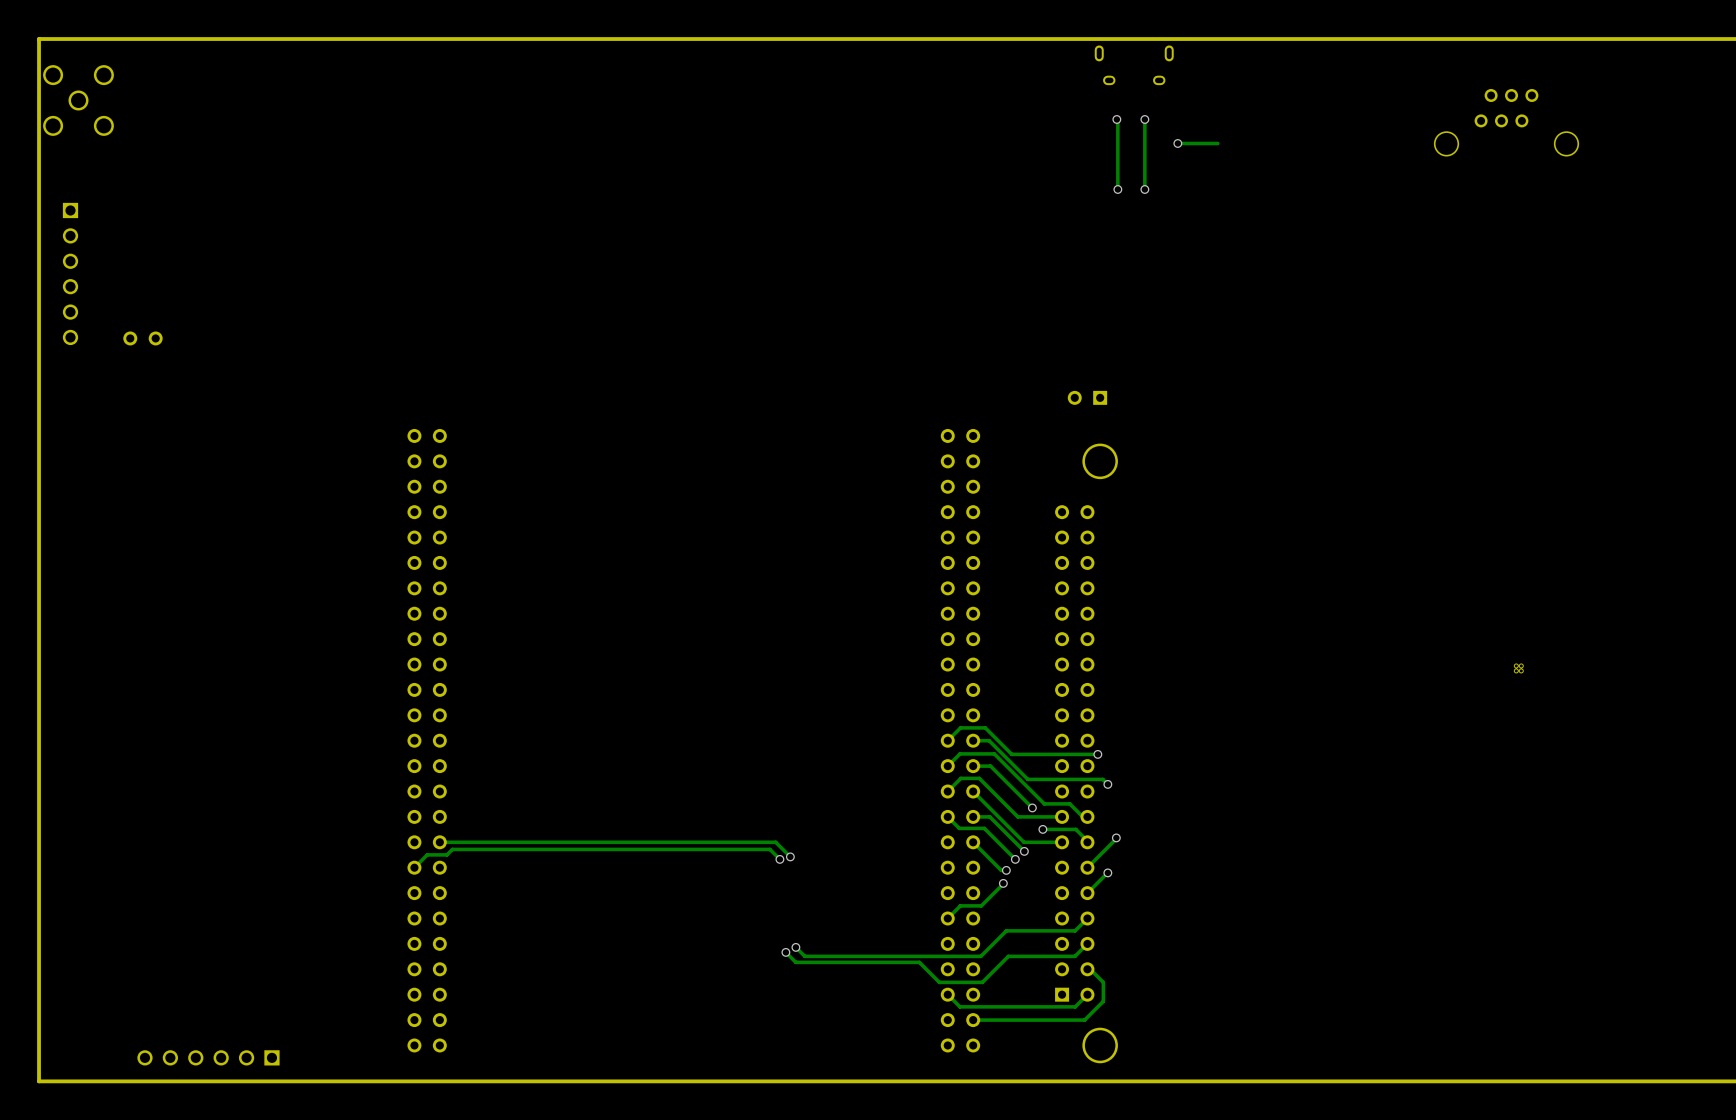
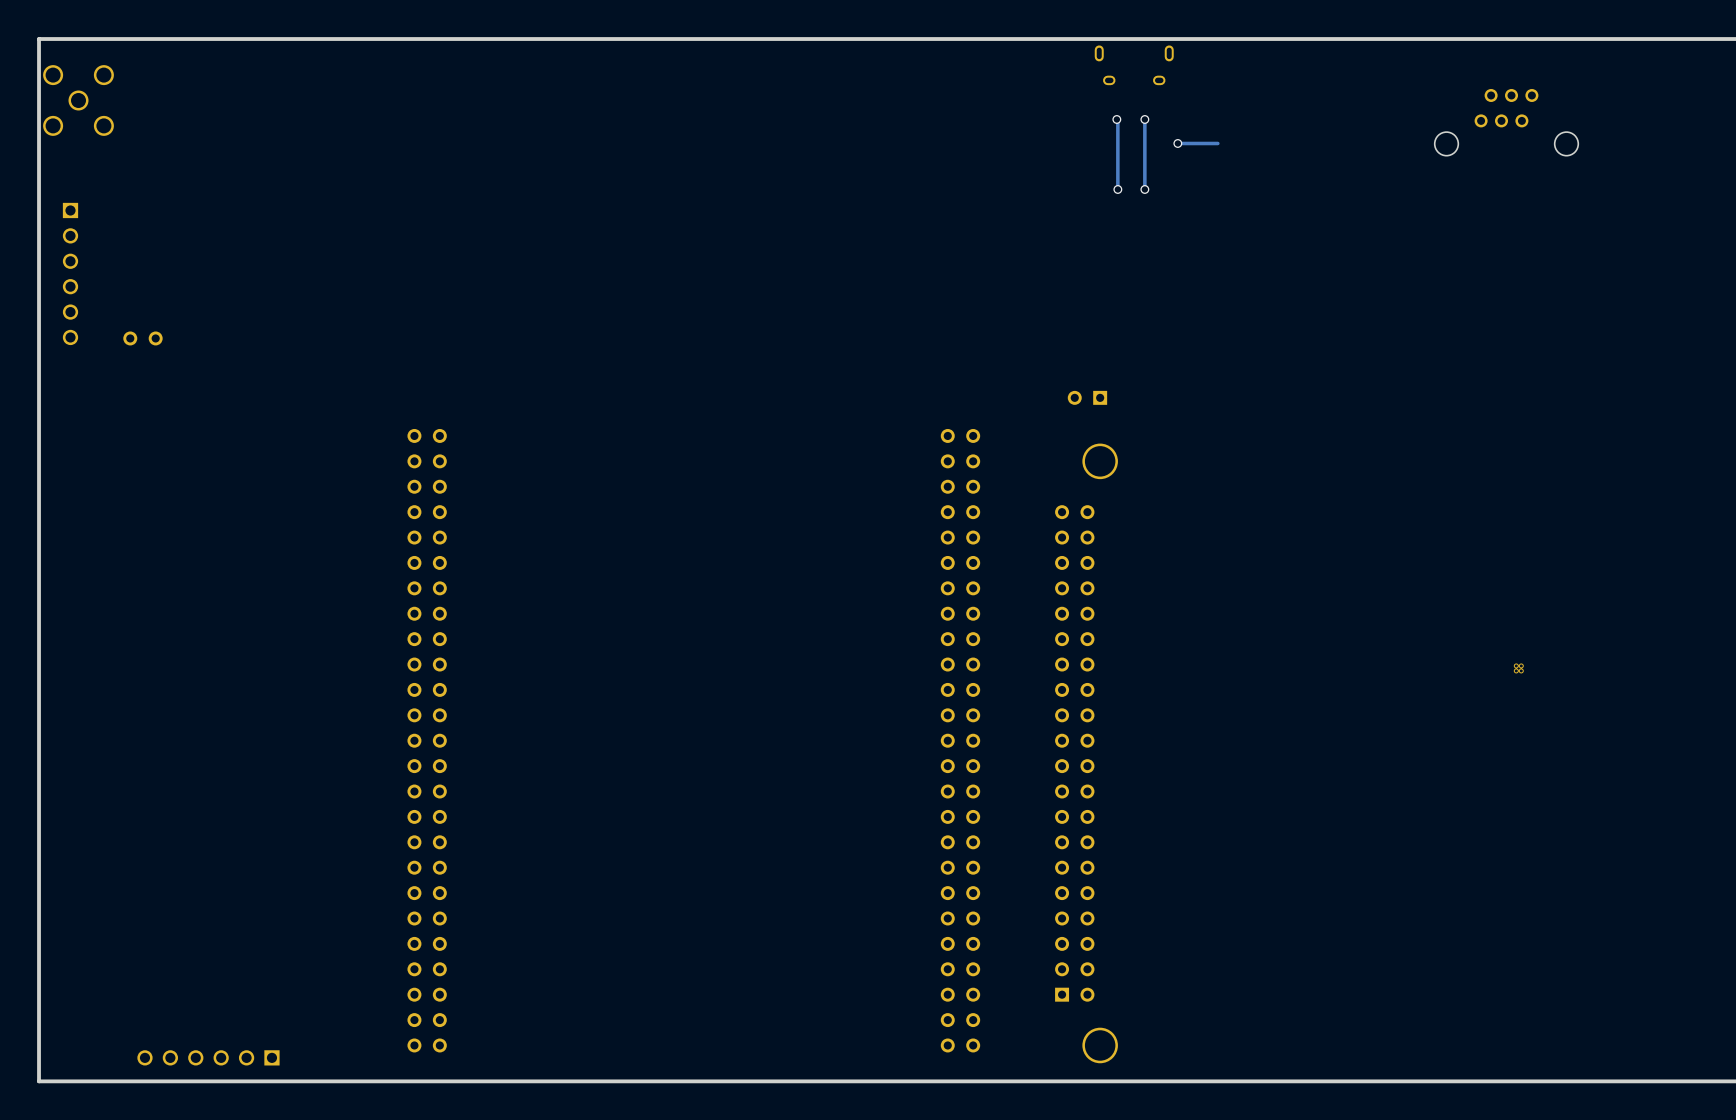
track: (947, 740) (960, 727) (985, 727) (1011, 754) (1097, 754) -> none
track: (973, 740) (989, 740) (1027, 779) (1102, 779) (1107, 784) -> none
via: (1097, 754) -> none
track: (947, 766) (959, 753) (994, 753) (1044, 803) (1069, 803) (1082, 816) (1087, 816) -> none
track: (973, 766) (990, 766) (1032, 807) -> none
via: (1107, 784) -> none
track: (947, 791) (960, 778) (979, 778) (1017, 816) (1062, 816) -> none
track: (973, 791) (1023, 842) (1062, 842) -> none
via: (1032, 807) -> none
track: (947, 816) (959, 828) (984, 828) (1015, 859) -> none
track: (973, 816) (989, 816) (1024, 851) -> none
track: (1042, 829) (1075, 829) (1087, 842) -> none
via: (1042, 829) -> none
track: (1116, 837) (1087, 867) -> none
via: (1116, 837) -> none
track: (439, 842) (775, 842) (790, 856) -> none
track: (973, 842) (1001, 870) (1006, 870) -> none
via: (1024, 851) -> none
via: (790, 856) -> none
track: (779, 859) (769, 849) (452, 849) (446, 854) (427, 854) (414, 867) -> none
via: (779, 859) -> none
via: (1015, 859) -> none
via: (1006, 870) -> none
track: (1107, 872) (1087, 893) -> none
via: (1107, 872) -> none
track: (1003, 883) (981, 905) (960, 905) (947, 918) -> none
via: (1003, 883) -> none
track: (1087, 918) (1075, 930) (1006, 930) (980, 956) (804, 956) (795, 947) -> none
track: (1087, 943) (1074, 956) (1008, 956) (982, 982) (939, 982) (919, 962) (795, 962) (785, 952) -> none
via: (795, 947) -> none
via: (785, 952) -> none
track: (1087, 969) (1090, 969) (1103, 982) (1103, 1001) (1084, 1020) (973, 1020) -> none
track: (1087, 994) (1075, 1006) (959, 1006) (947, 994) -> none

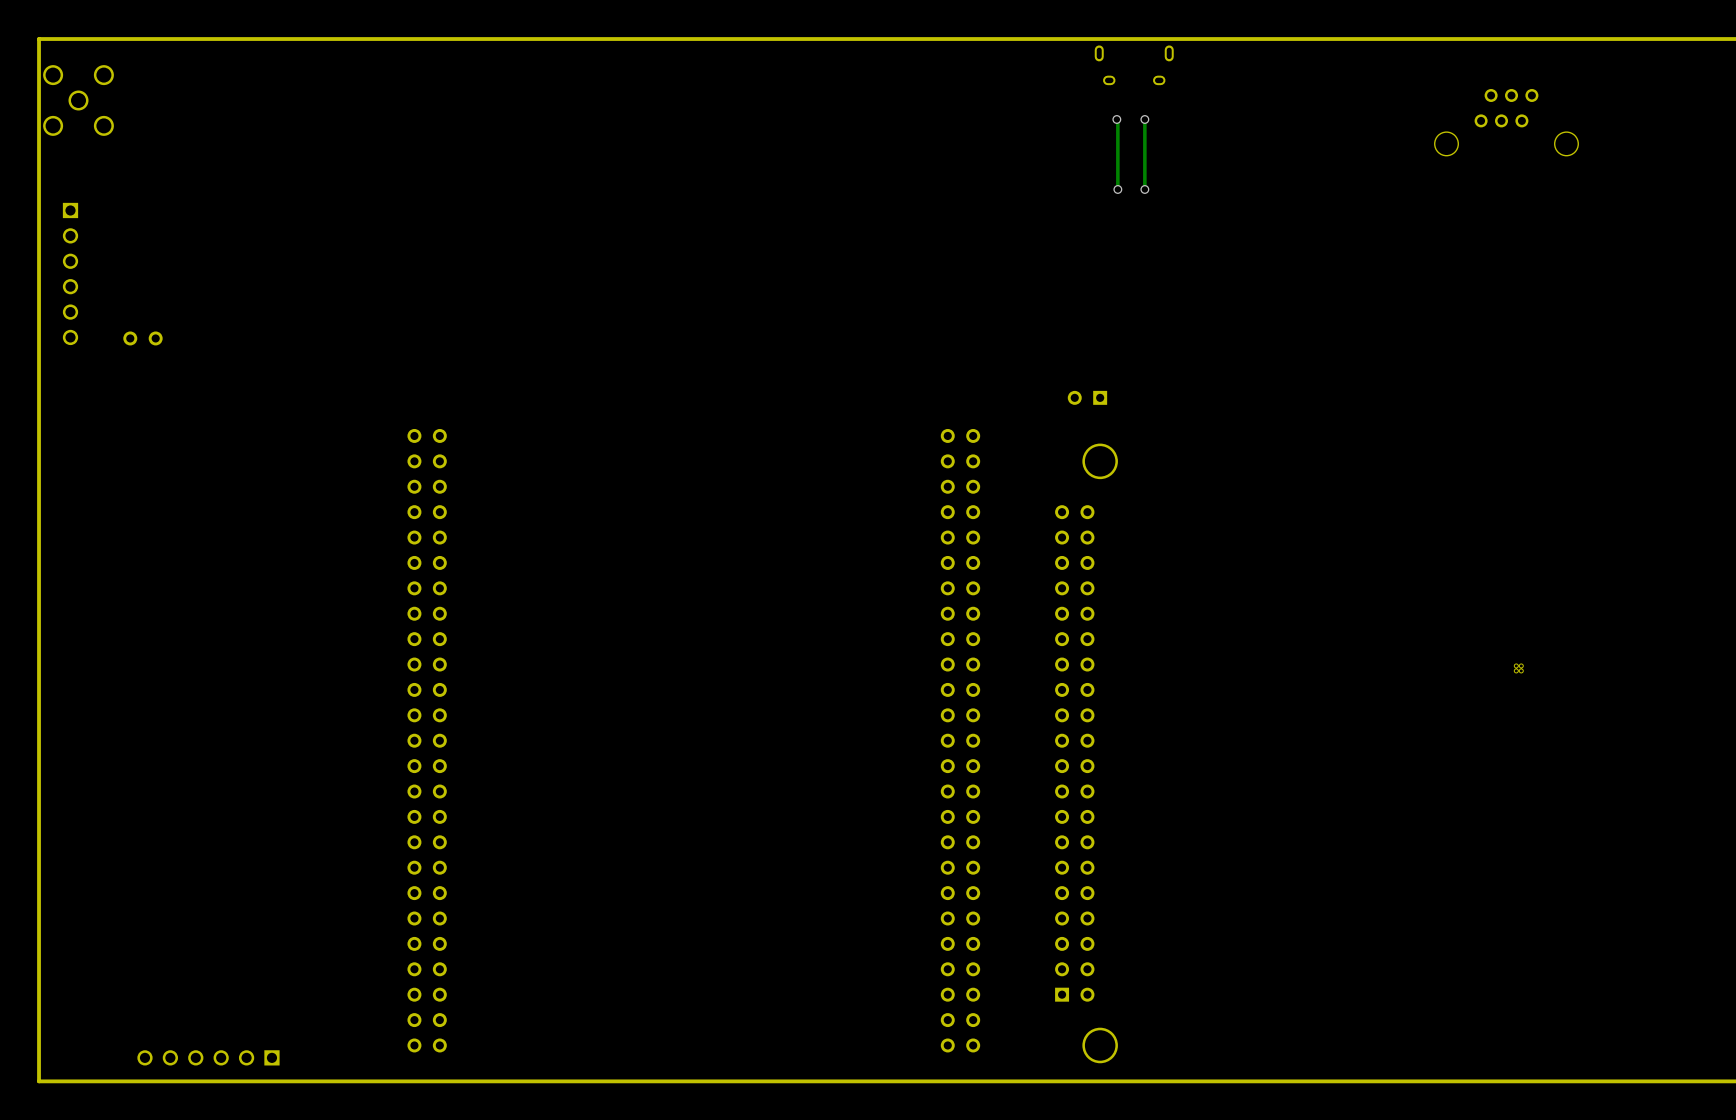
via: (1177, 143) -> none
track: (1217, 143) (1177, 143) -> none

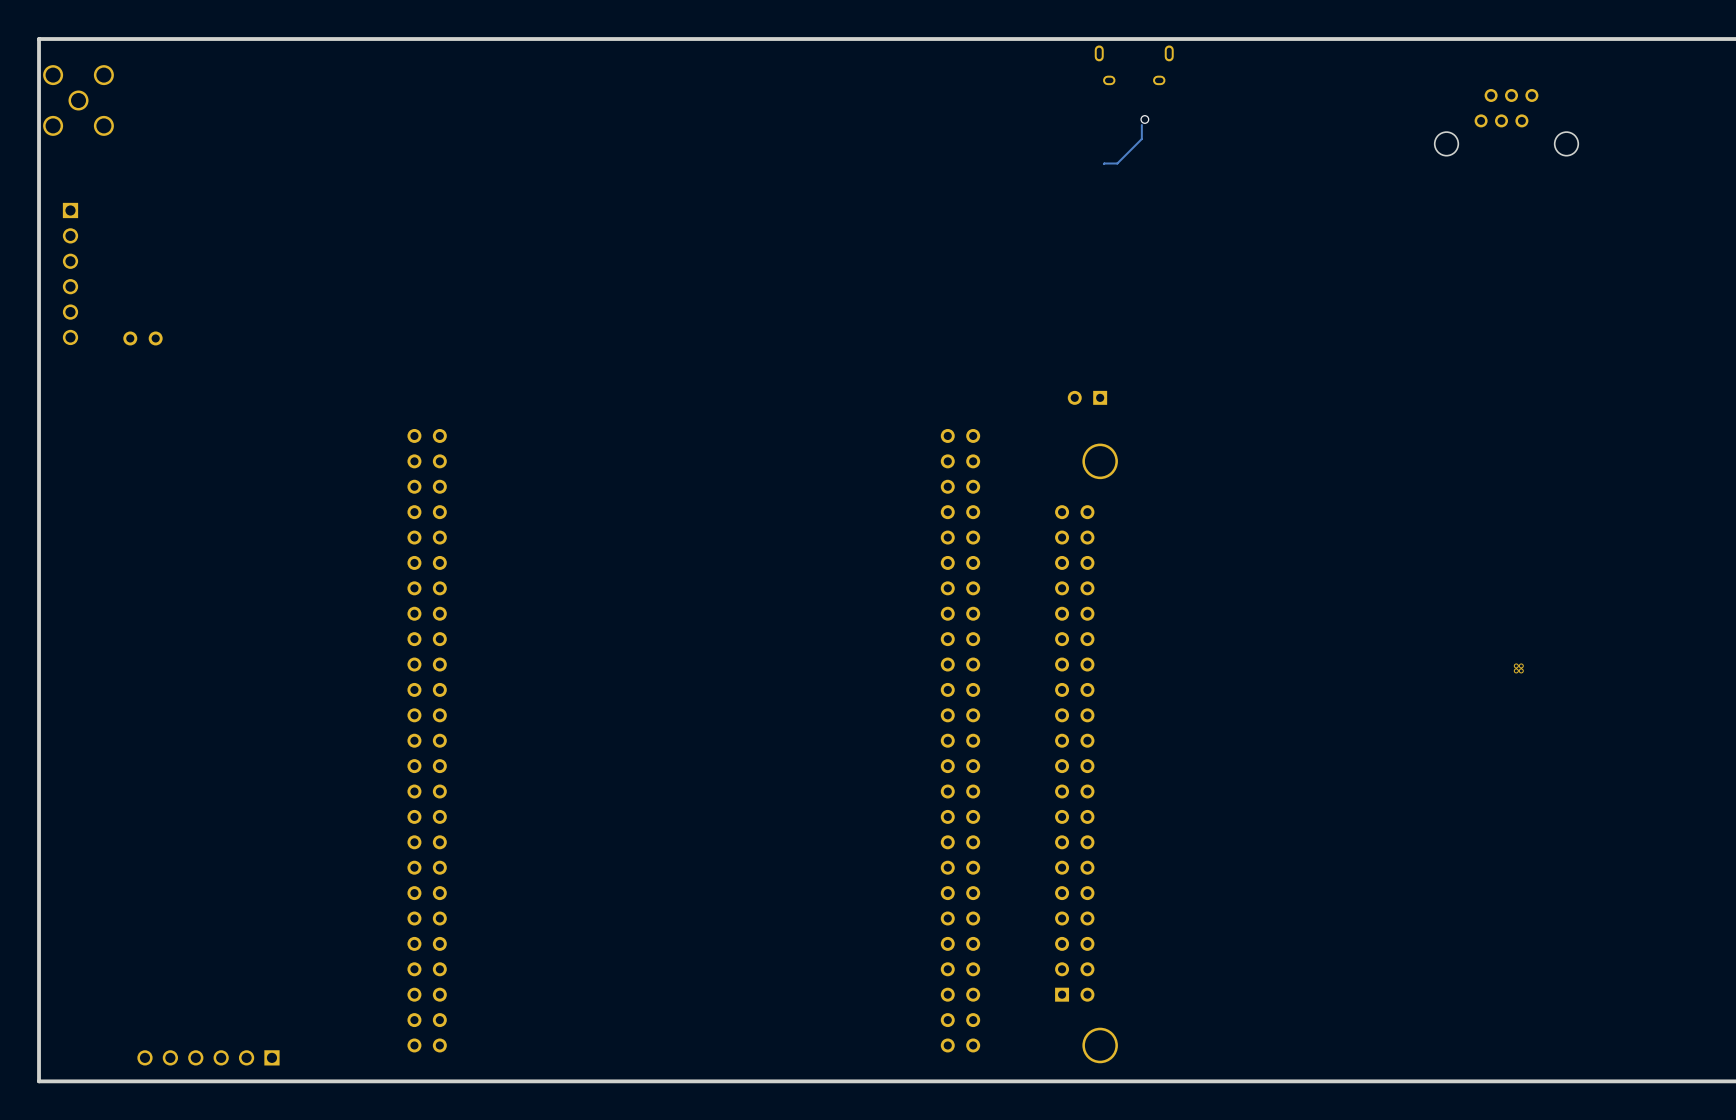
track: (1116, 119) (1117, 189) -> none
via: (1116, 119) -> none
track: (1144, 119) (1144, 189) -> none
track: none -> (1141, 125) (1141, 138) (1117, 163) (1103, 163)
via: (1117, 189) -> none
via: (1144, 189) -> none

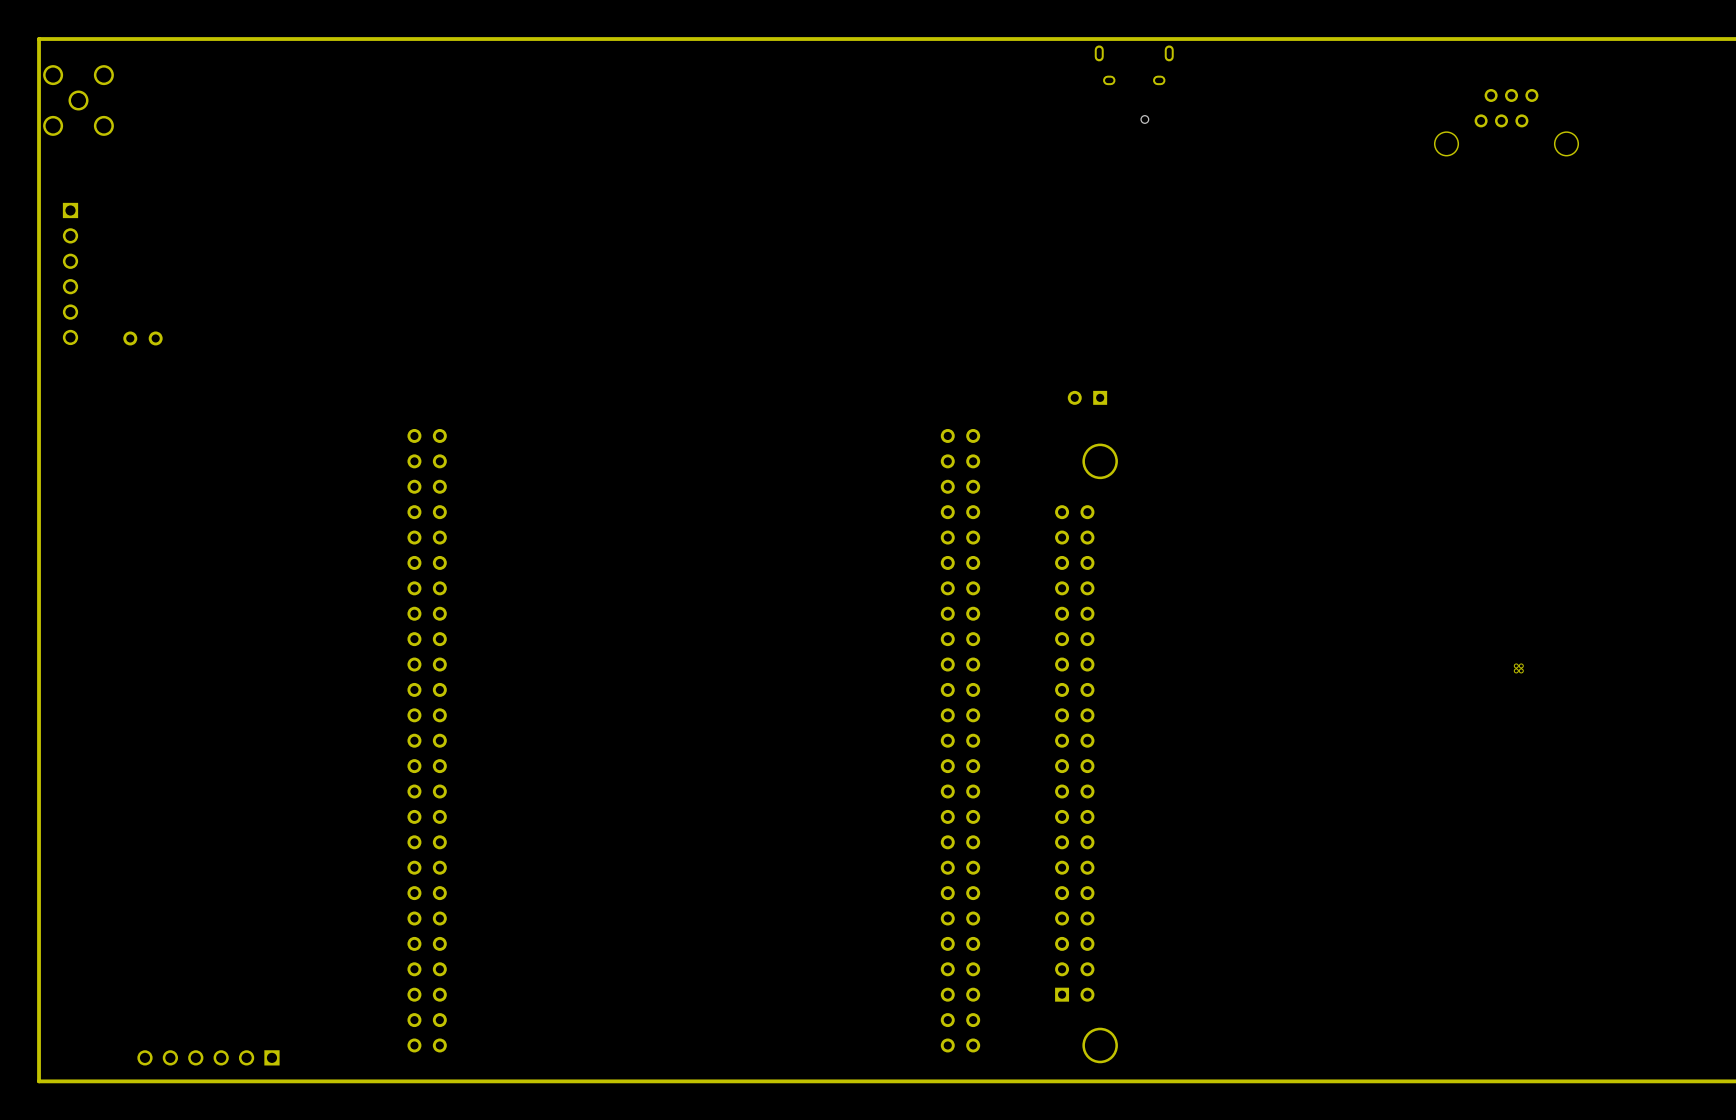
track: (1141, 125) (1141, 138) (1117, 163) (1103, 163) -> none

